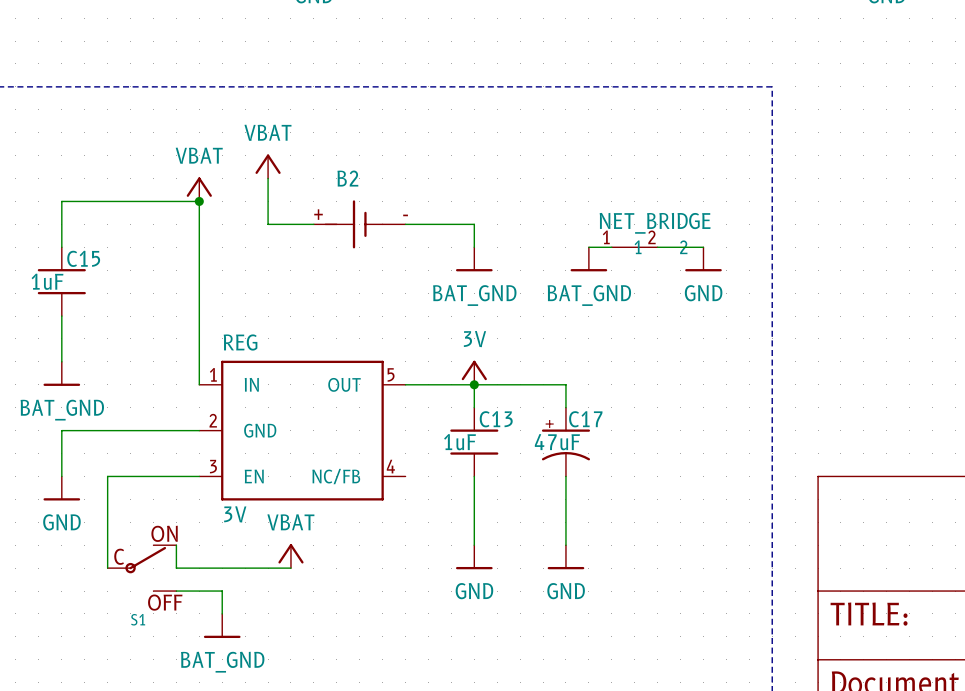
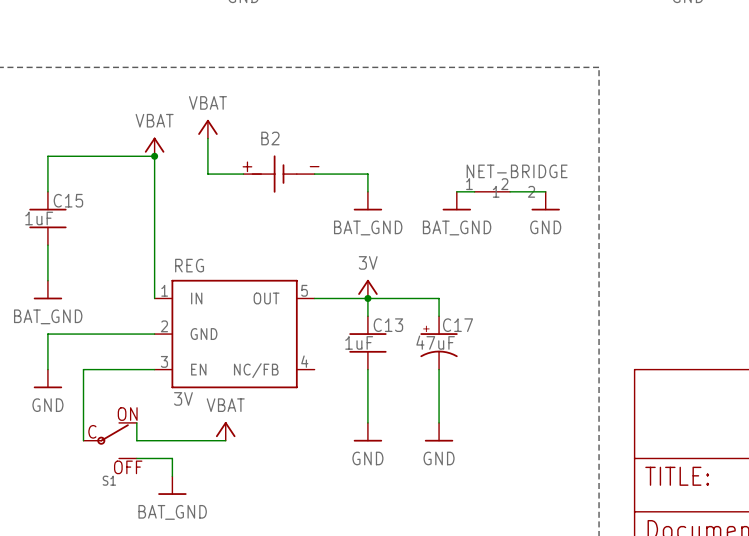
NET_BRIDGE name: NET_BRIDGE (655, 223) -> NET-BRIDGE (517, 171)

